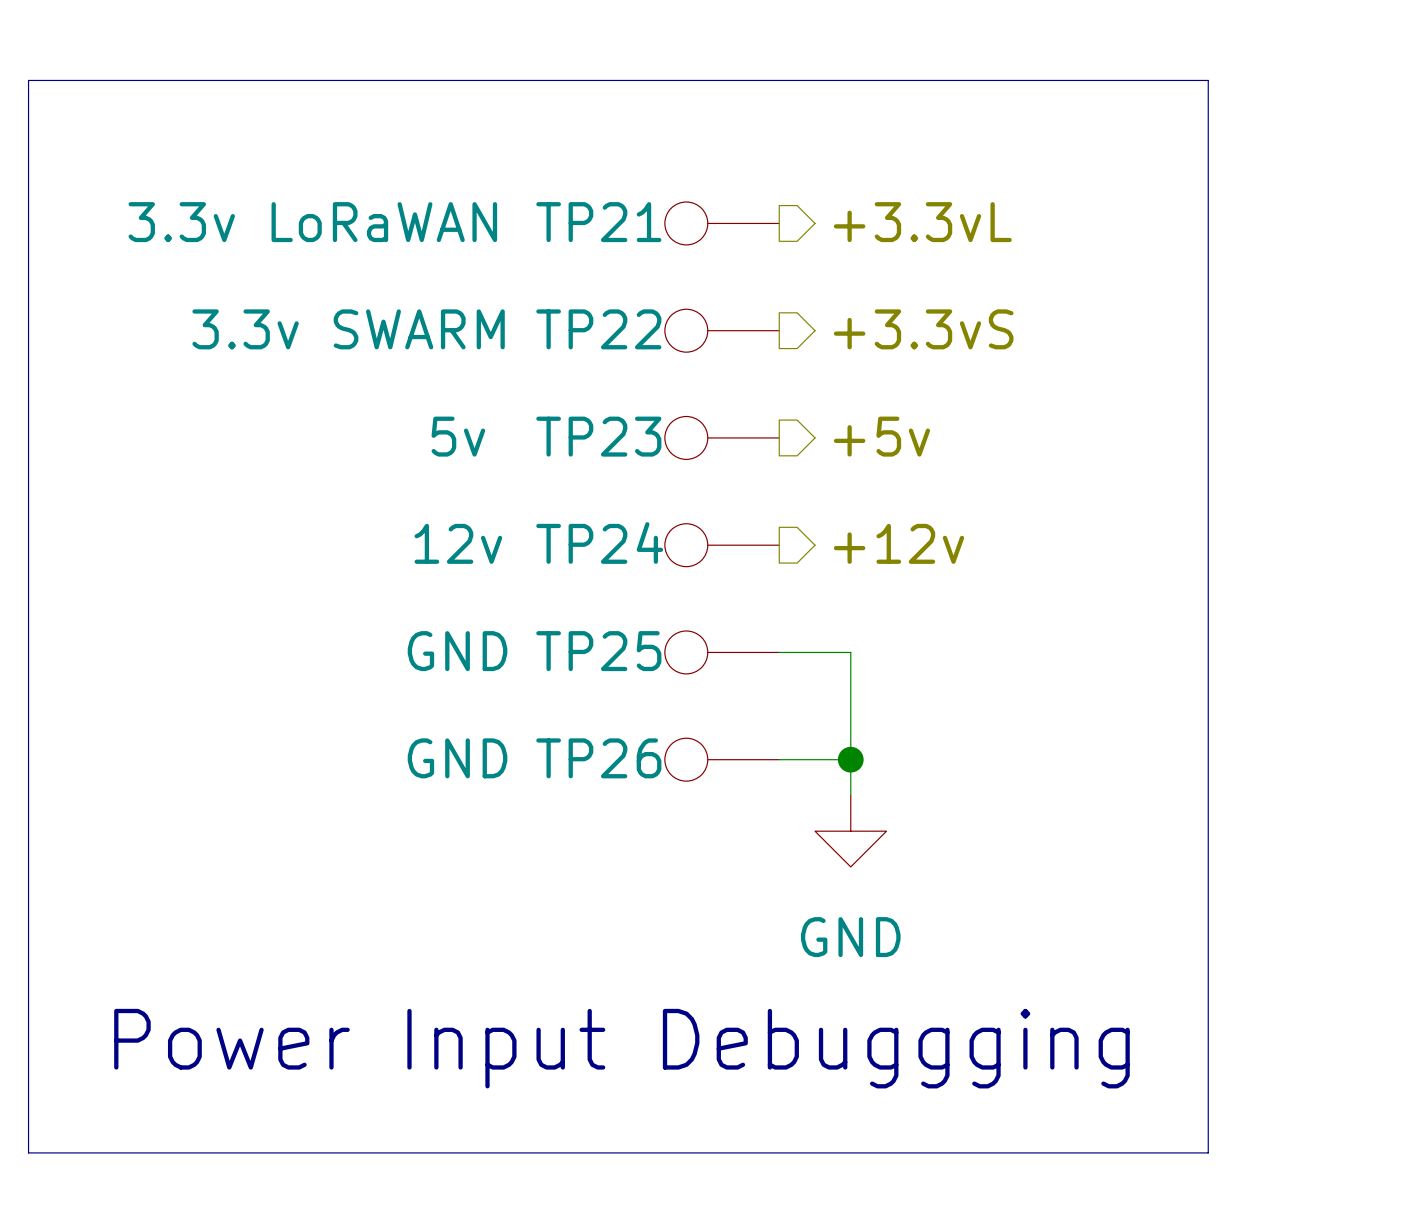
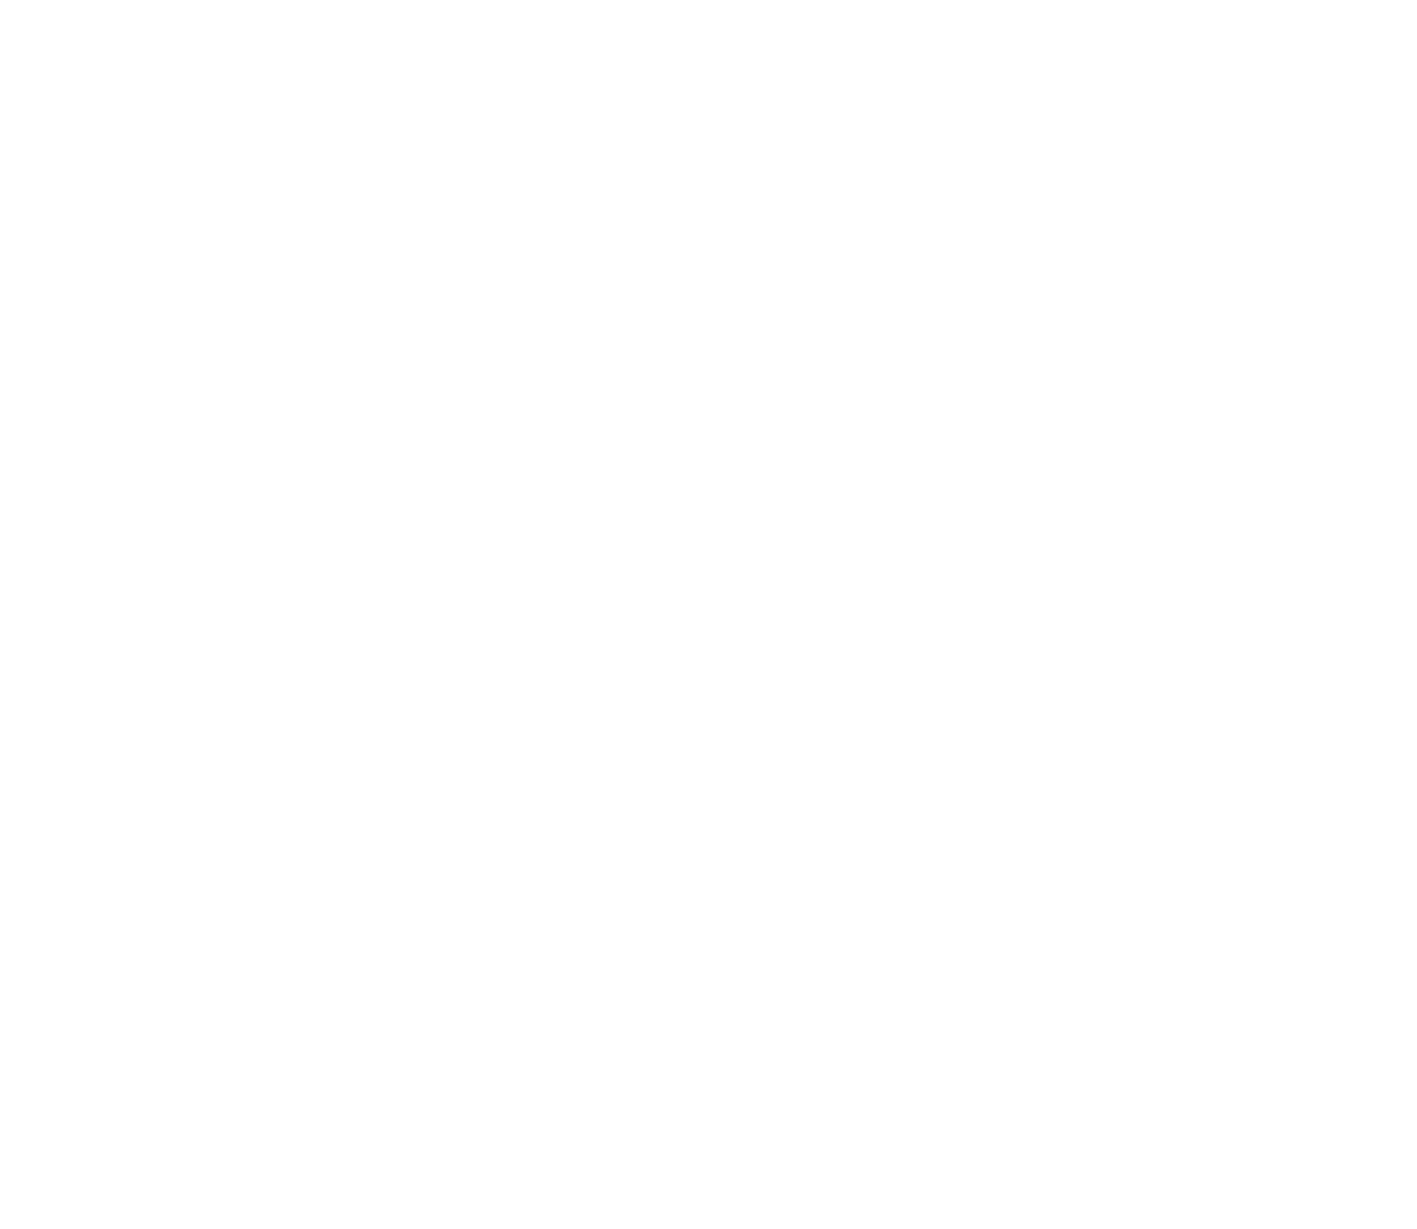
line: (28, 80) (1208, 80) (1208, 1152) (28, 1152) (28, 80) -> none
hierarchical label: +3.3vL (922, 222) -> none
TP21: 3.3v LoRaWAN (722, 223) -> none
hierarchical label: +3.3vS (923, 329) -> none
TP22: 3.3v SWARM (722, 330) -> none
hierarchical label: +5v (881, 436) -> none
TP23: 5v (722, 437) -> none
hierarchical label: +12v (898, 543) -> none
TP24: 12v (722, 545) -> none
TP25: GND (722, 652) -> none
wire: (779, 652) (850, 652) (850, 795) -> none
TP26: GND (722, 759) -> none
wire: (779, 759) (850, 759) -> none
junction: (850, 759) -> none
power symbol: GND (850, 831) -> none
text: Power Input Debuggging (621, 1048) -> none

